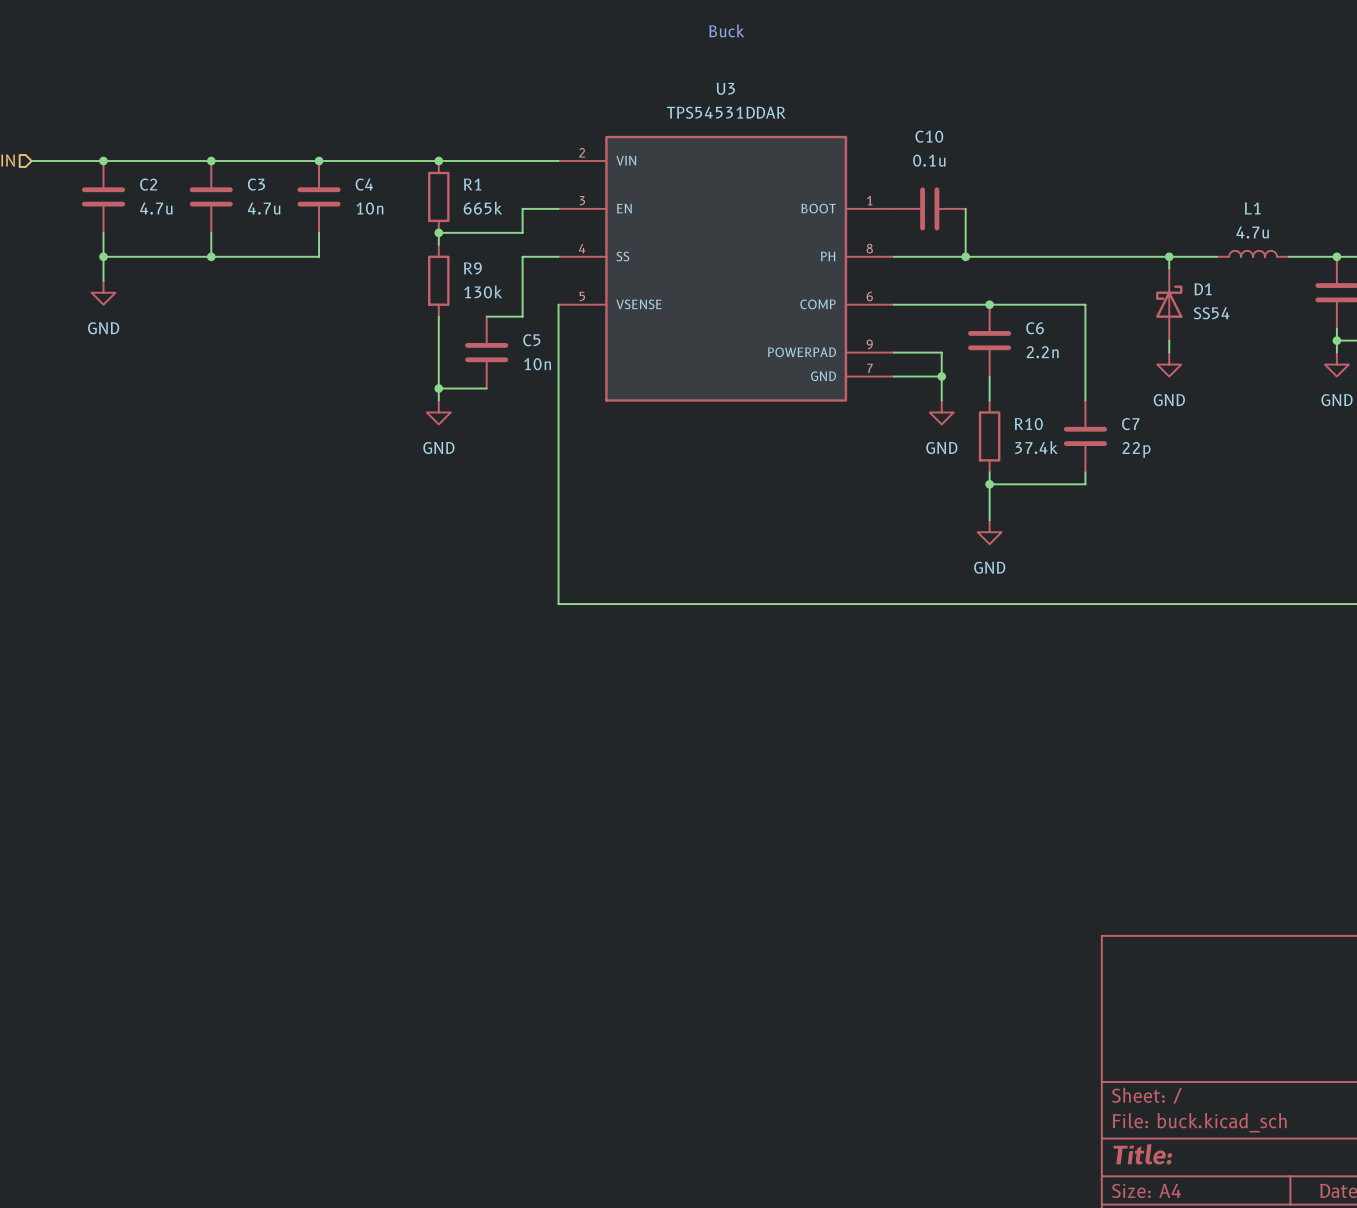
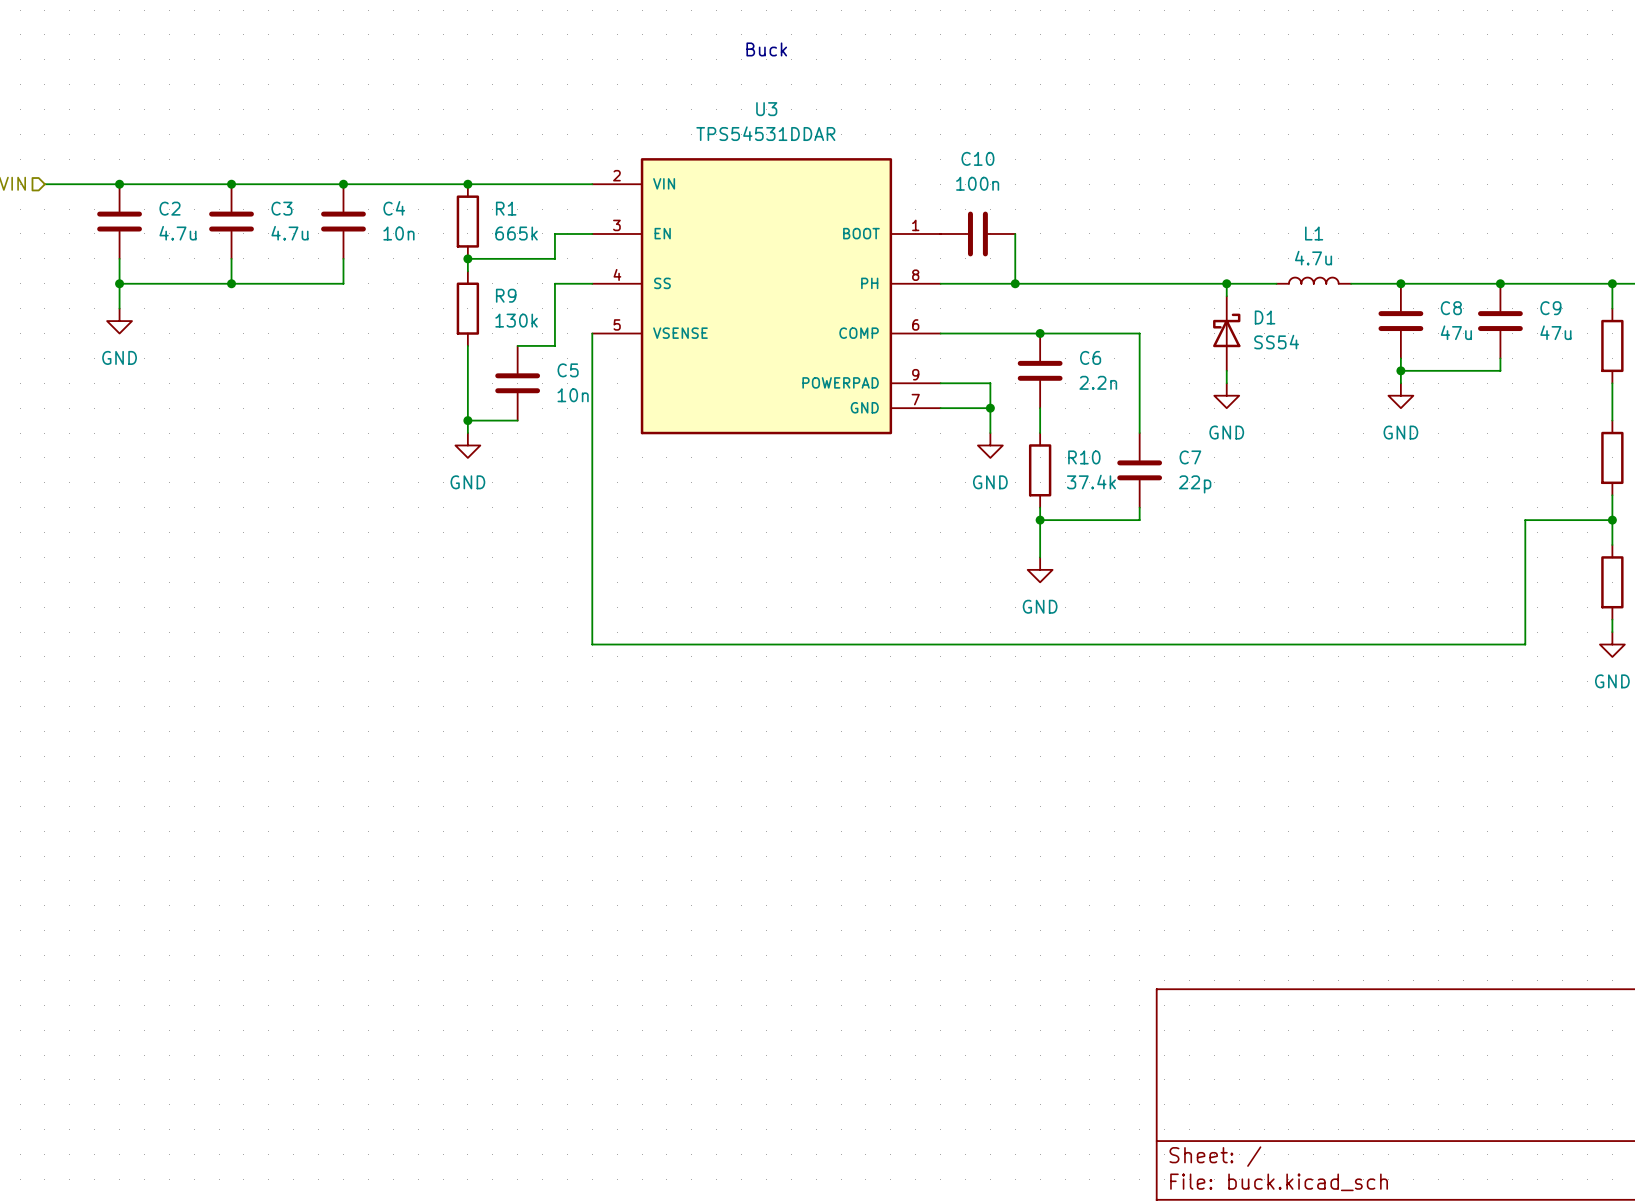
C10 value: 0.1u (929, 160) -> 100n (977, 183)

